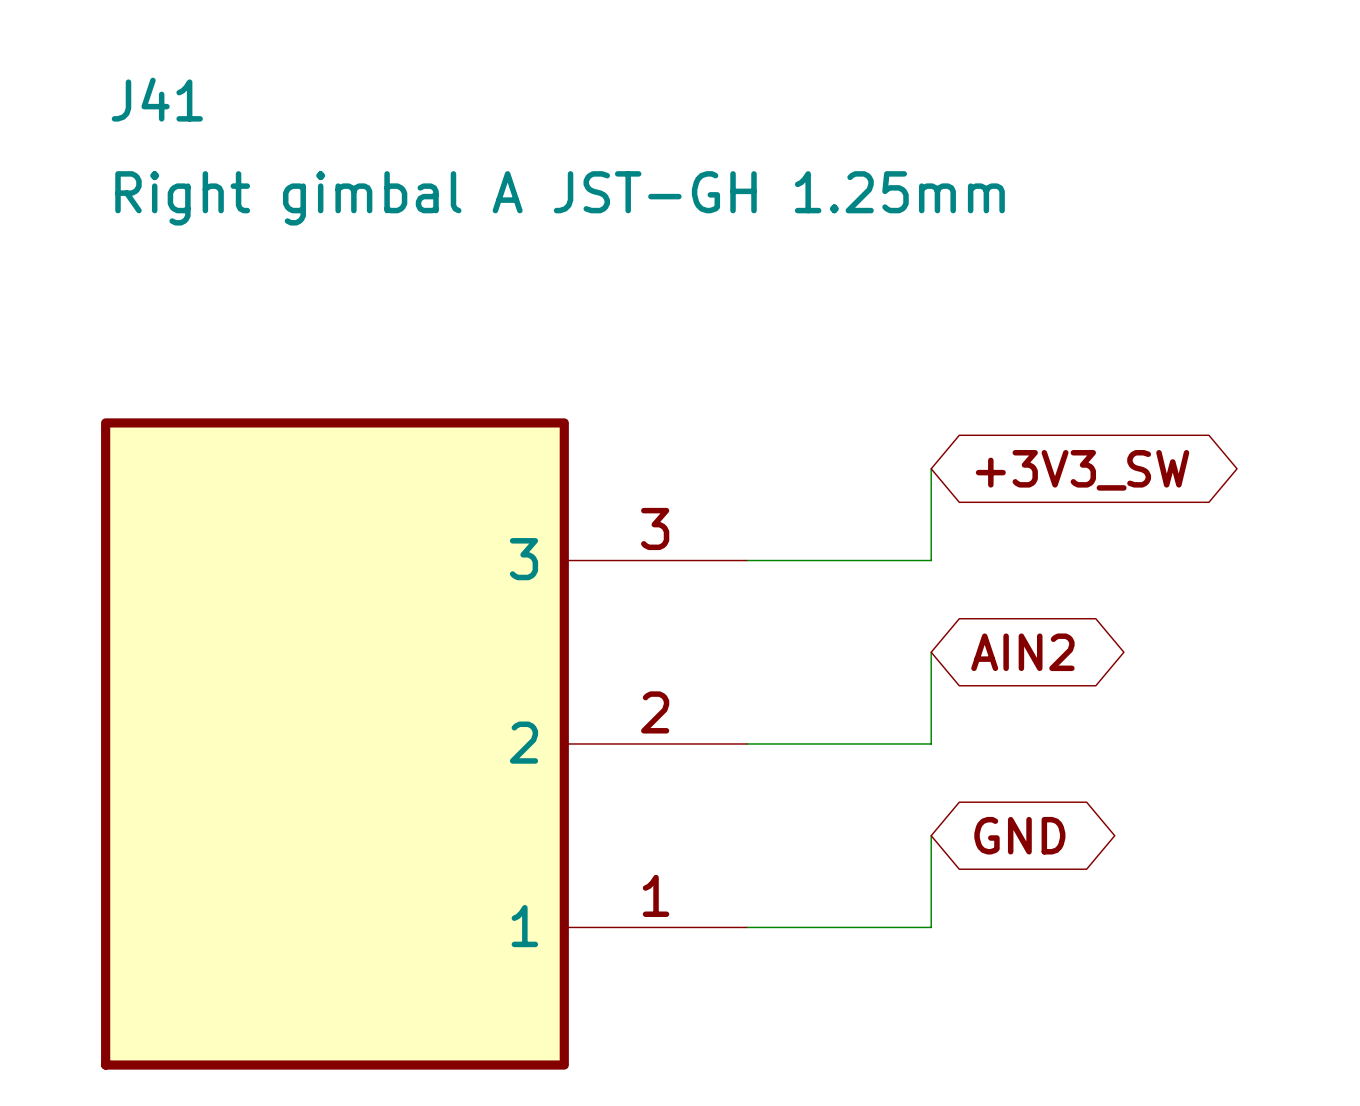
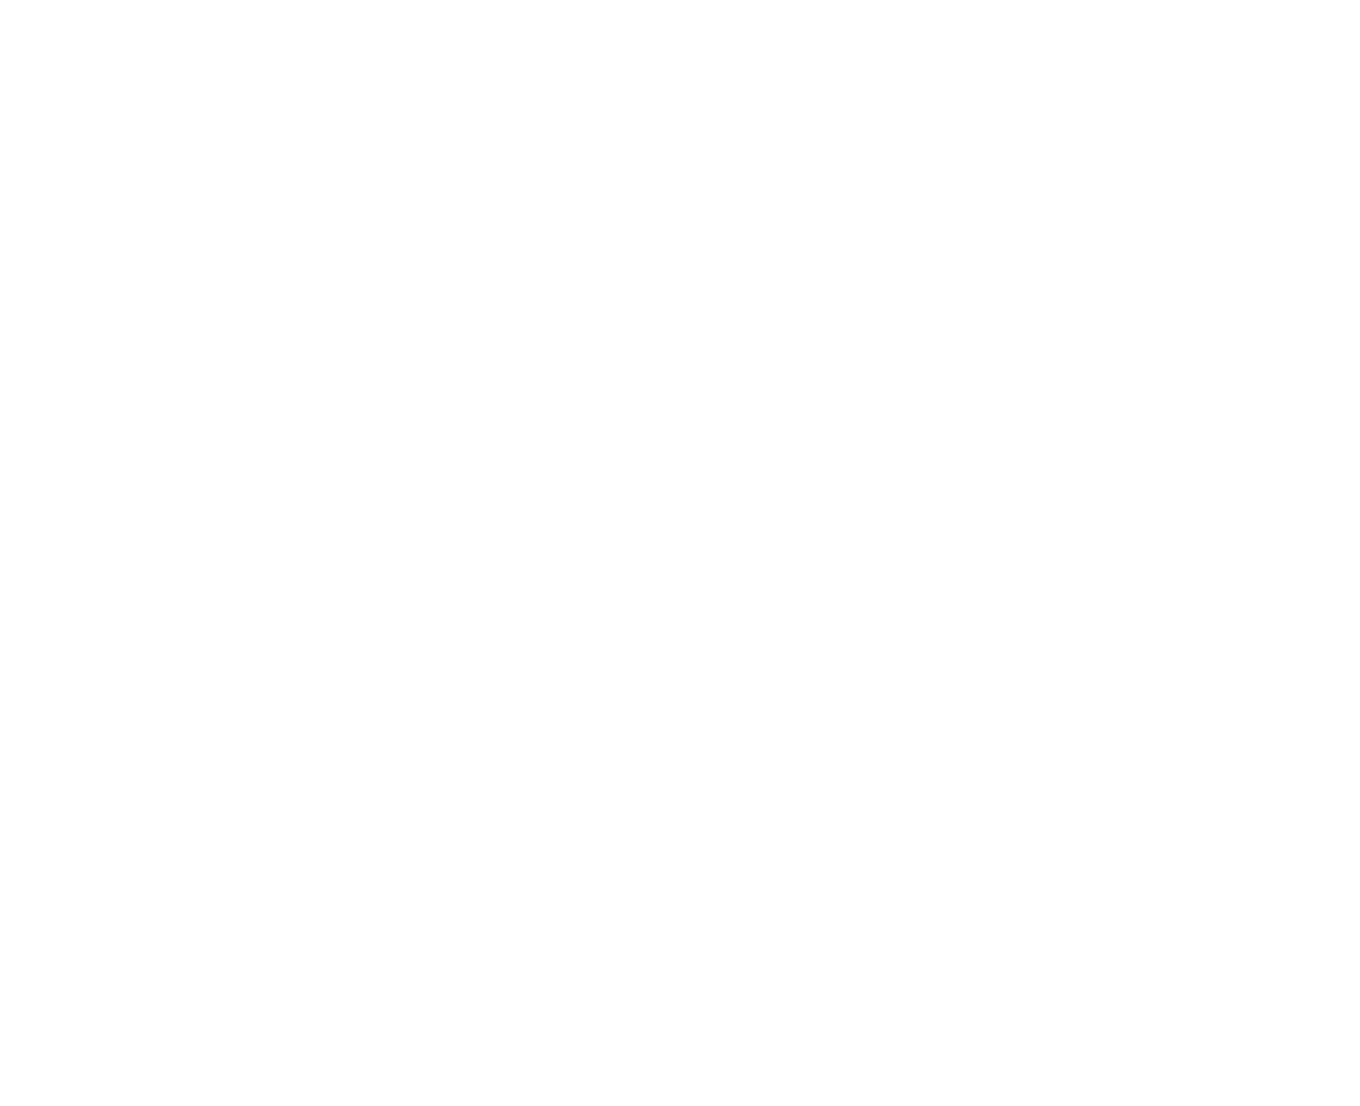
wire: (931, 468) (931, 560) (747, 560) -> none
global label: +3V3_SW (1082, 470) -> none
wire: (931, 652) (931, 743) (747, 743) -> none
global label: AIN2 (1022, 652) -> none
J41: Right gimbal A JST-GH 1.25mm (424, 743) -> none
wire: (931, 835) (931, 927) (747, 927) -> none
global label: GND (1019, 835) -> none

